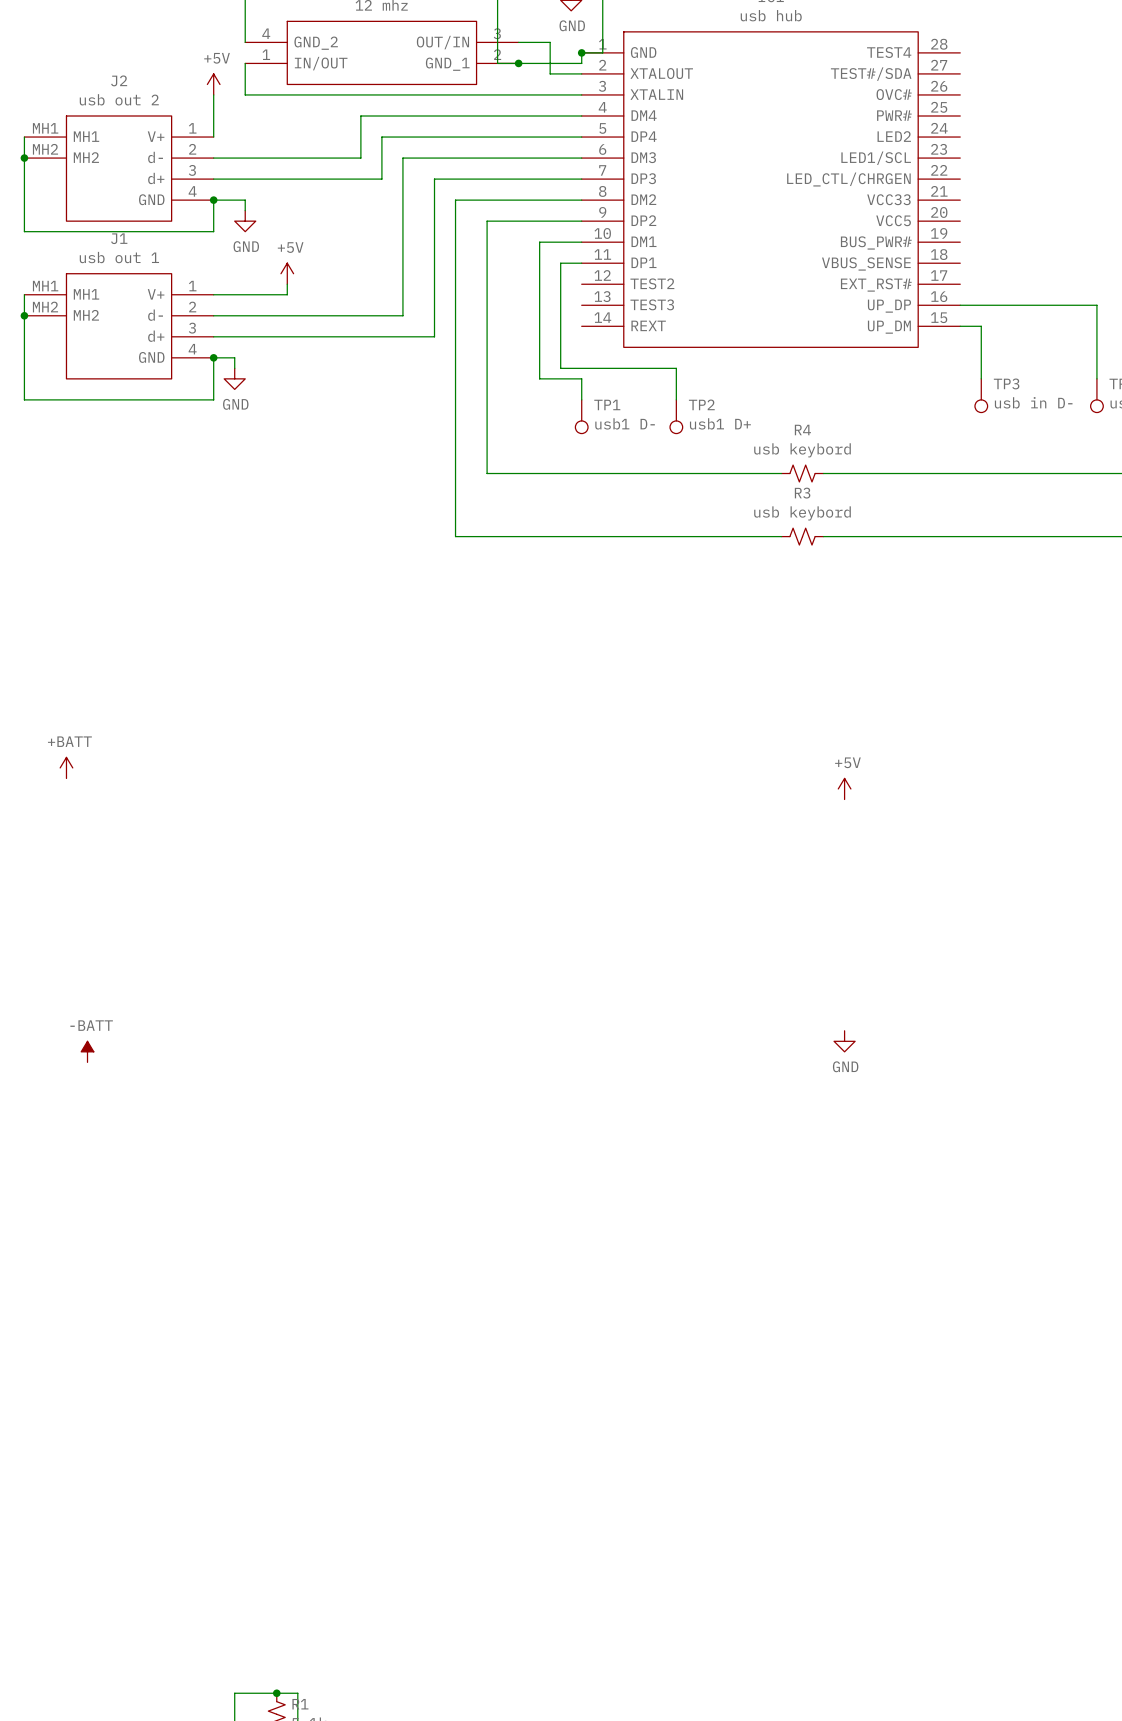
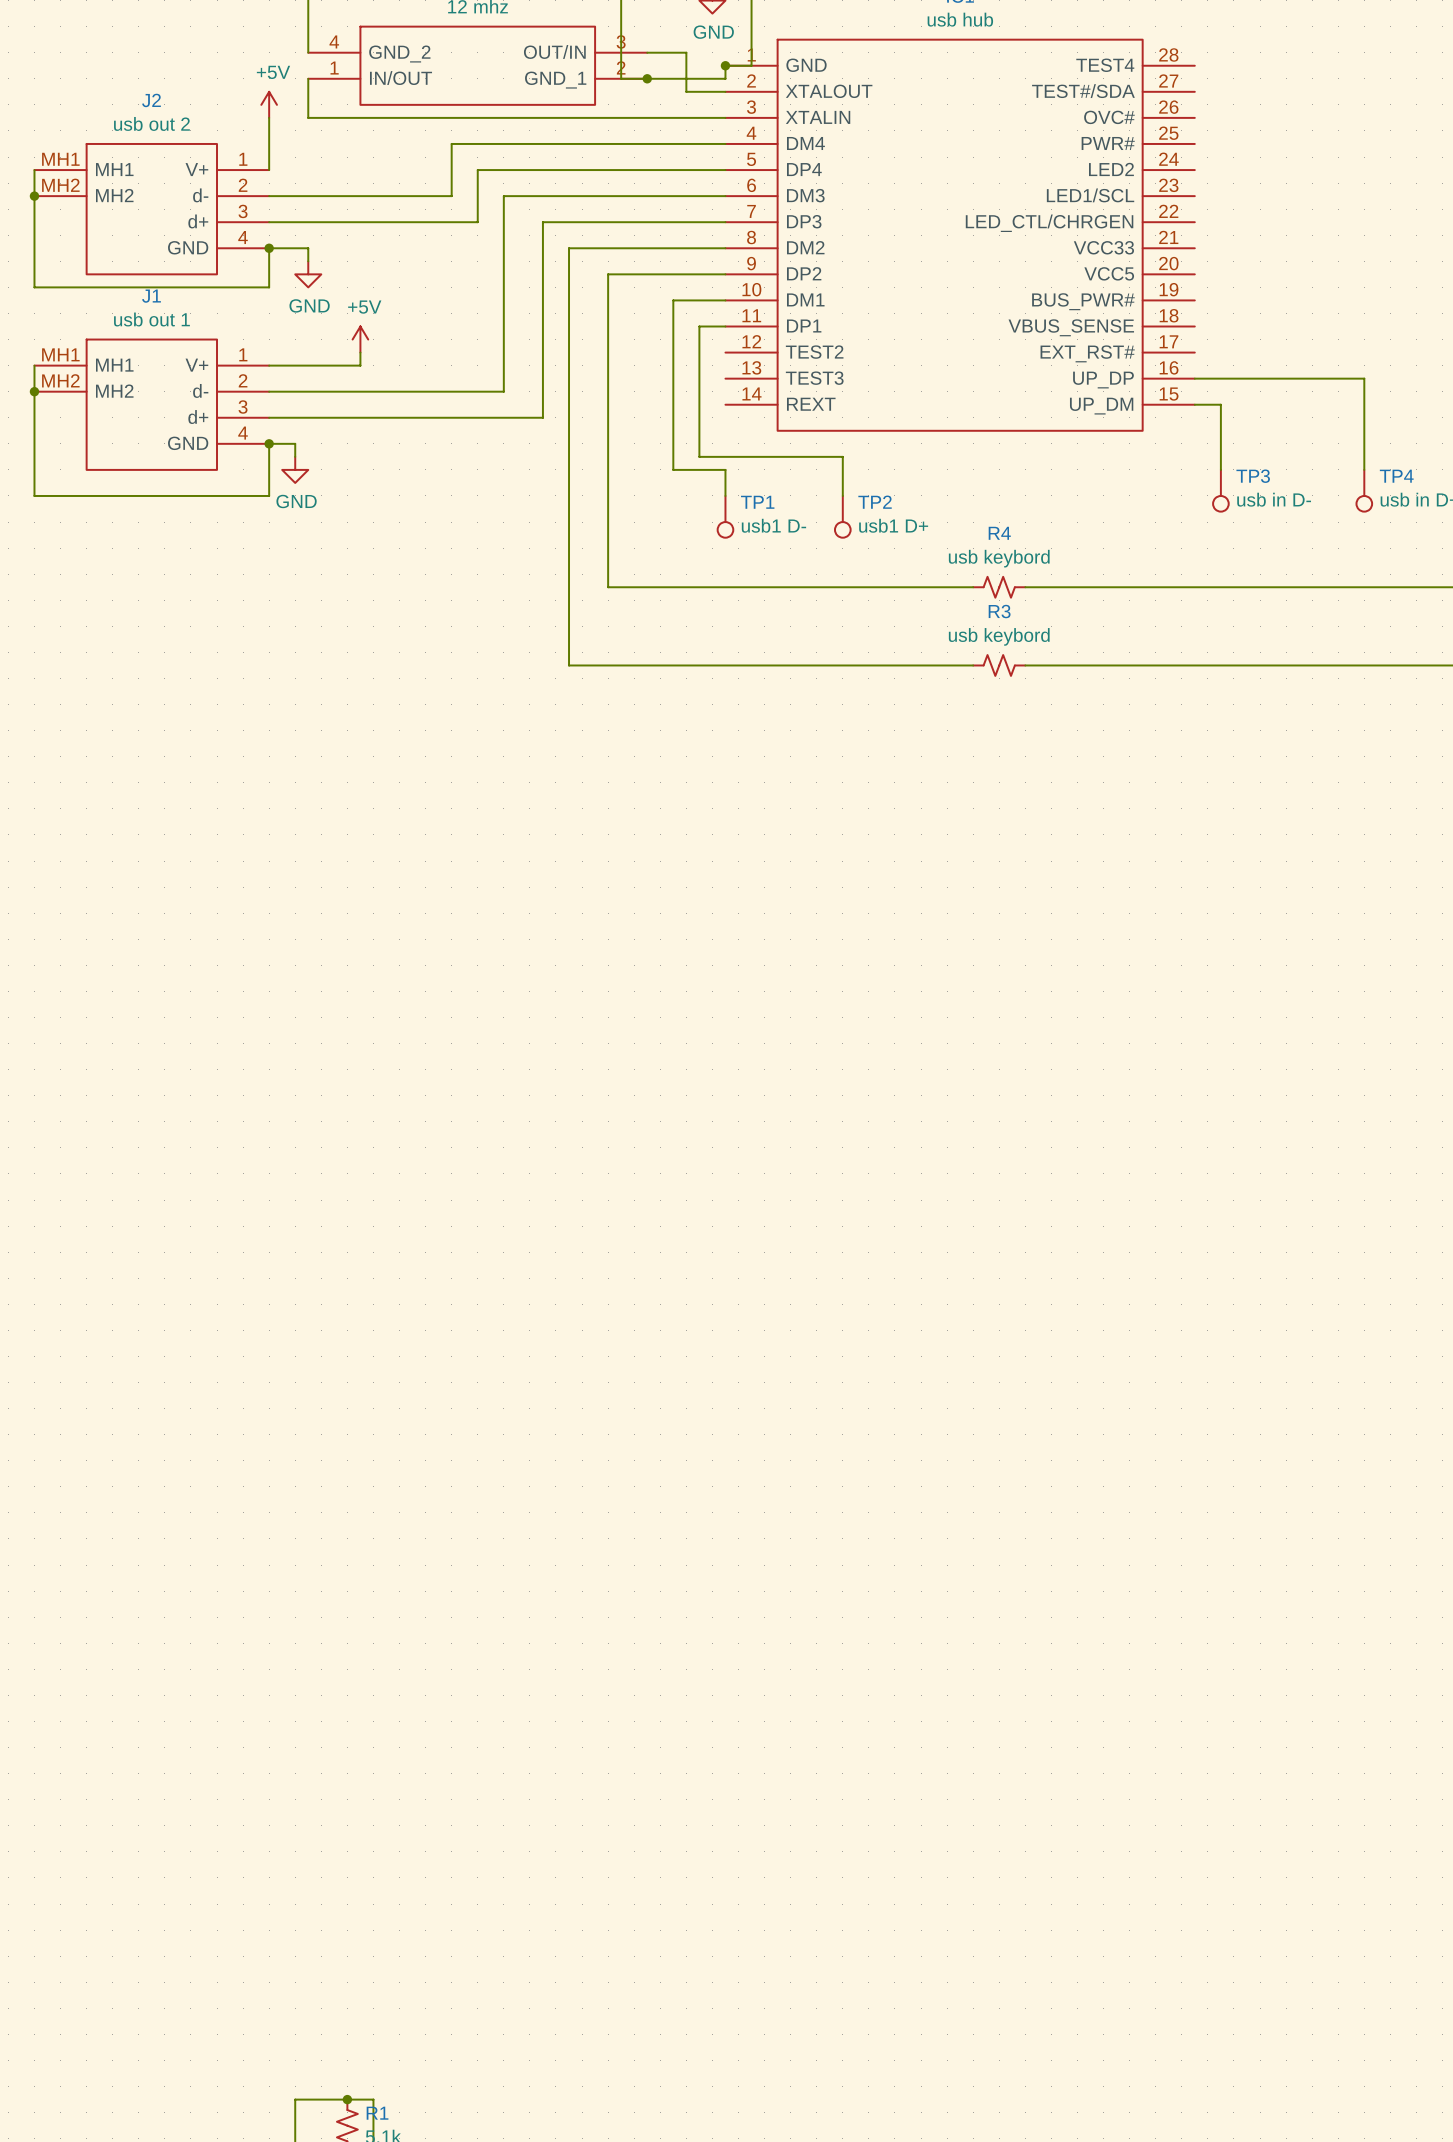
power symbol: +BATT (66, 767) -> none
power symbol: +5V (844, 788) -> none
power symbol: GND (844, 1041) -> none
power symbol: -BATT (87, 1051) -> none

